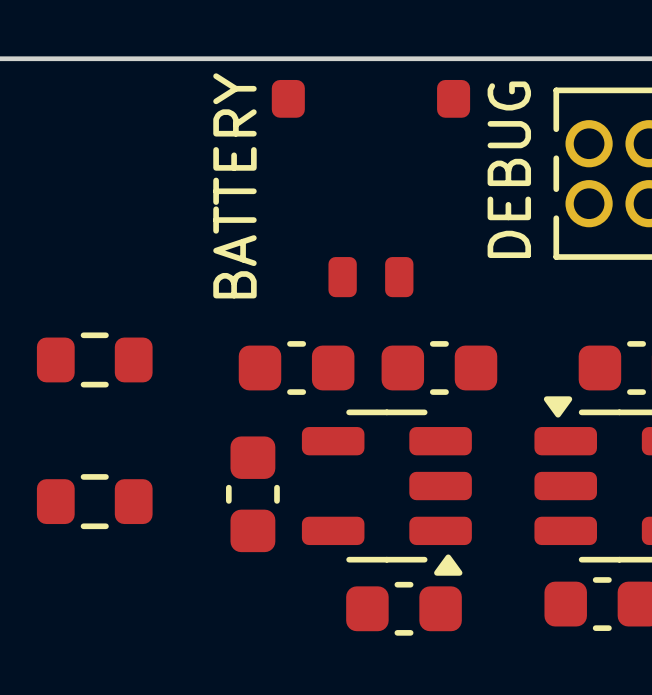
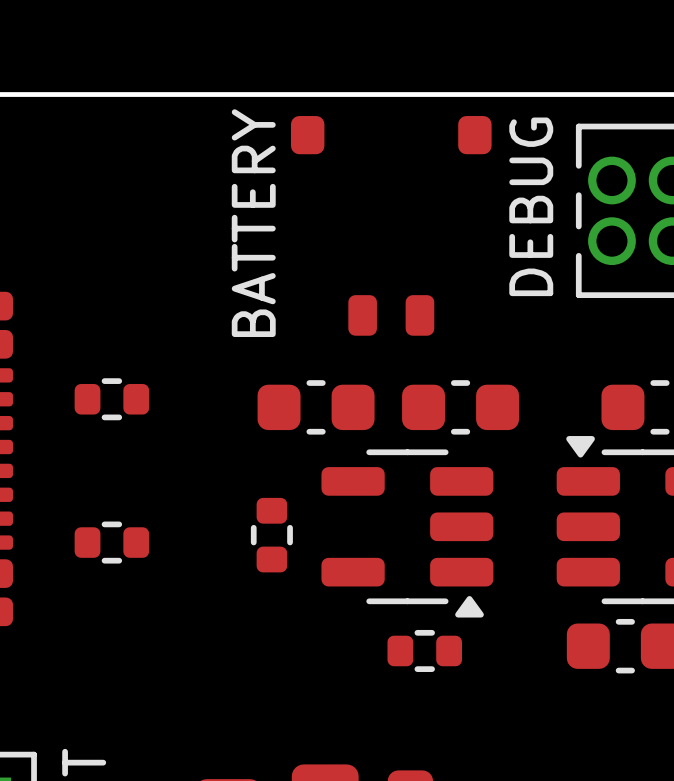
part footprint: [36, 332, 153, 388] -> [74, 378, 150, 421]
part footprint: [226, 436, 280, 553] -> [250, 497, 293, 573]
part footprint: [36, 474, 153, 530] -> [74, 521, 150, 564]
part footprint: [346, 581, 462, 636] -> [387, 629, 462, 672]

